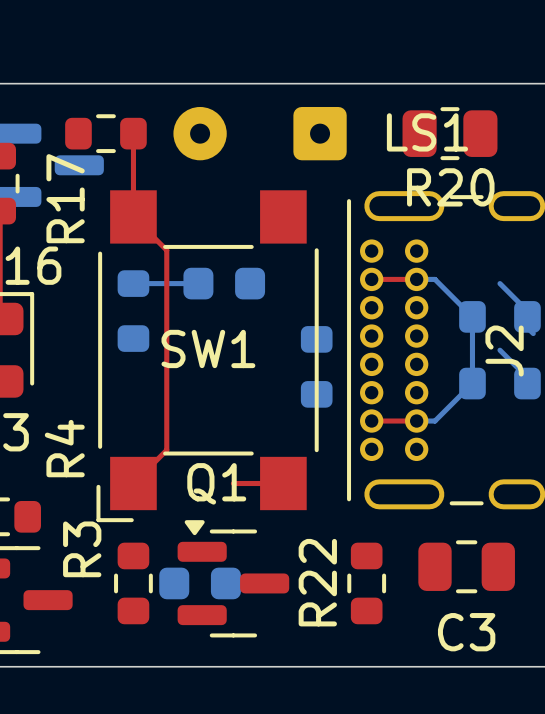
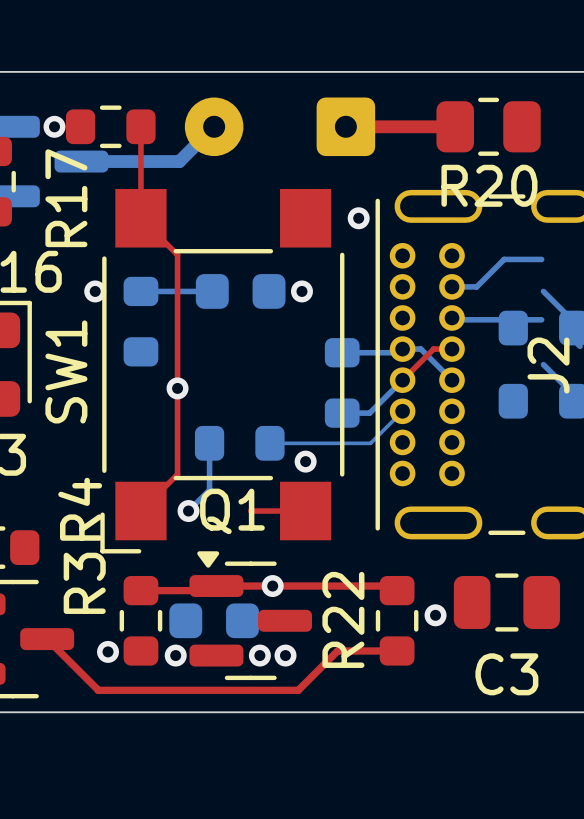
LS1 name: LS1 (427, 132) -> none
via: none -> (54, 126)
bottom track: none -> (214, 126) (179, 161) (81, 161)
top track: none -> (345, 126) (455, 126)
via: none -> (358, 218)
top track: (371, 279) (416, 279) -> none
bottom track: (434, 279) (472, 316) (472, 383) (434, 421) (416, 421) -> (472, 286) (476, 286) (504, 259) (541, 259)
via: none -> (95, 291)
via: none -> (301, 291)
bottom track: none -> (452, 317) (453, 319) (541, 319)
top track: none -> (452, 349) (433, 349) (402, 380)
bottom track: none -> (342, 352) (398, 352) (402, 349) (420, 349) (452, 380)
SW1 name rotation: 0° (208, 348) -> 90° counterclockwise (66, 371)
SW1 name position: SW1 (208, 348) -> SW1 (66, 371)
bottom track: none -> (402, 380) (369, 413) (342, 413)
via: none -> (177, 388)
bottom track: none -> (402, 411) (370, 443) (269, 443)
bottom track: none -> (209, 443) (209, 489) (188, 511)
part: none -> (239, 443)
top track: (371, 421) (416, 421) -> none
via: none -> (305, 461)
R4 name position: R4 (64, 448) -> R4 (80, 509)
via: none -> (188, 511)
via: none -> (272, 586)
top track: none -> (140, 590) (211, 590) (216, 586) (392, 586) (397, 590)
via: none -> (435, 615)
top track: none -> (47, 639) (98, 690) (298, 690) (337, 650) (397, 650)
via: none -> (108, 651)
via: none -> (175, 655)
via: none -> (259, 655)
via: none -> (285, 655)

